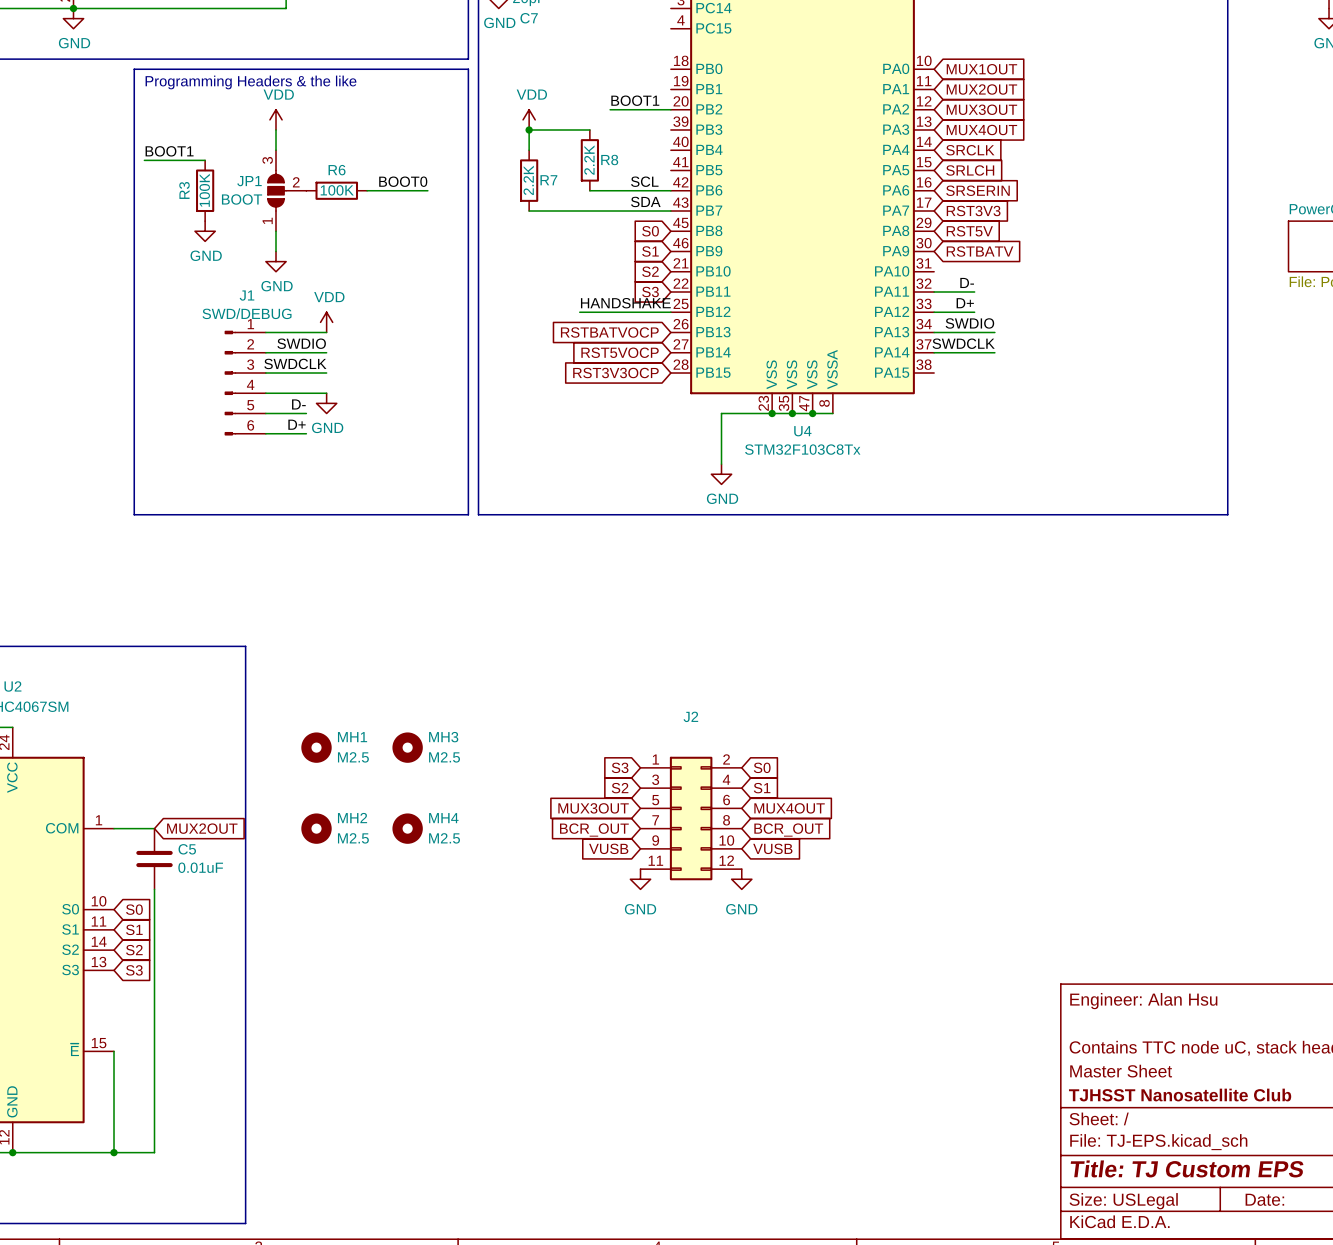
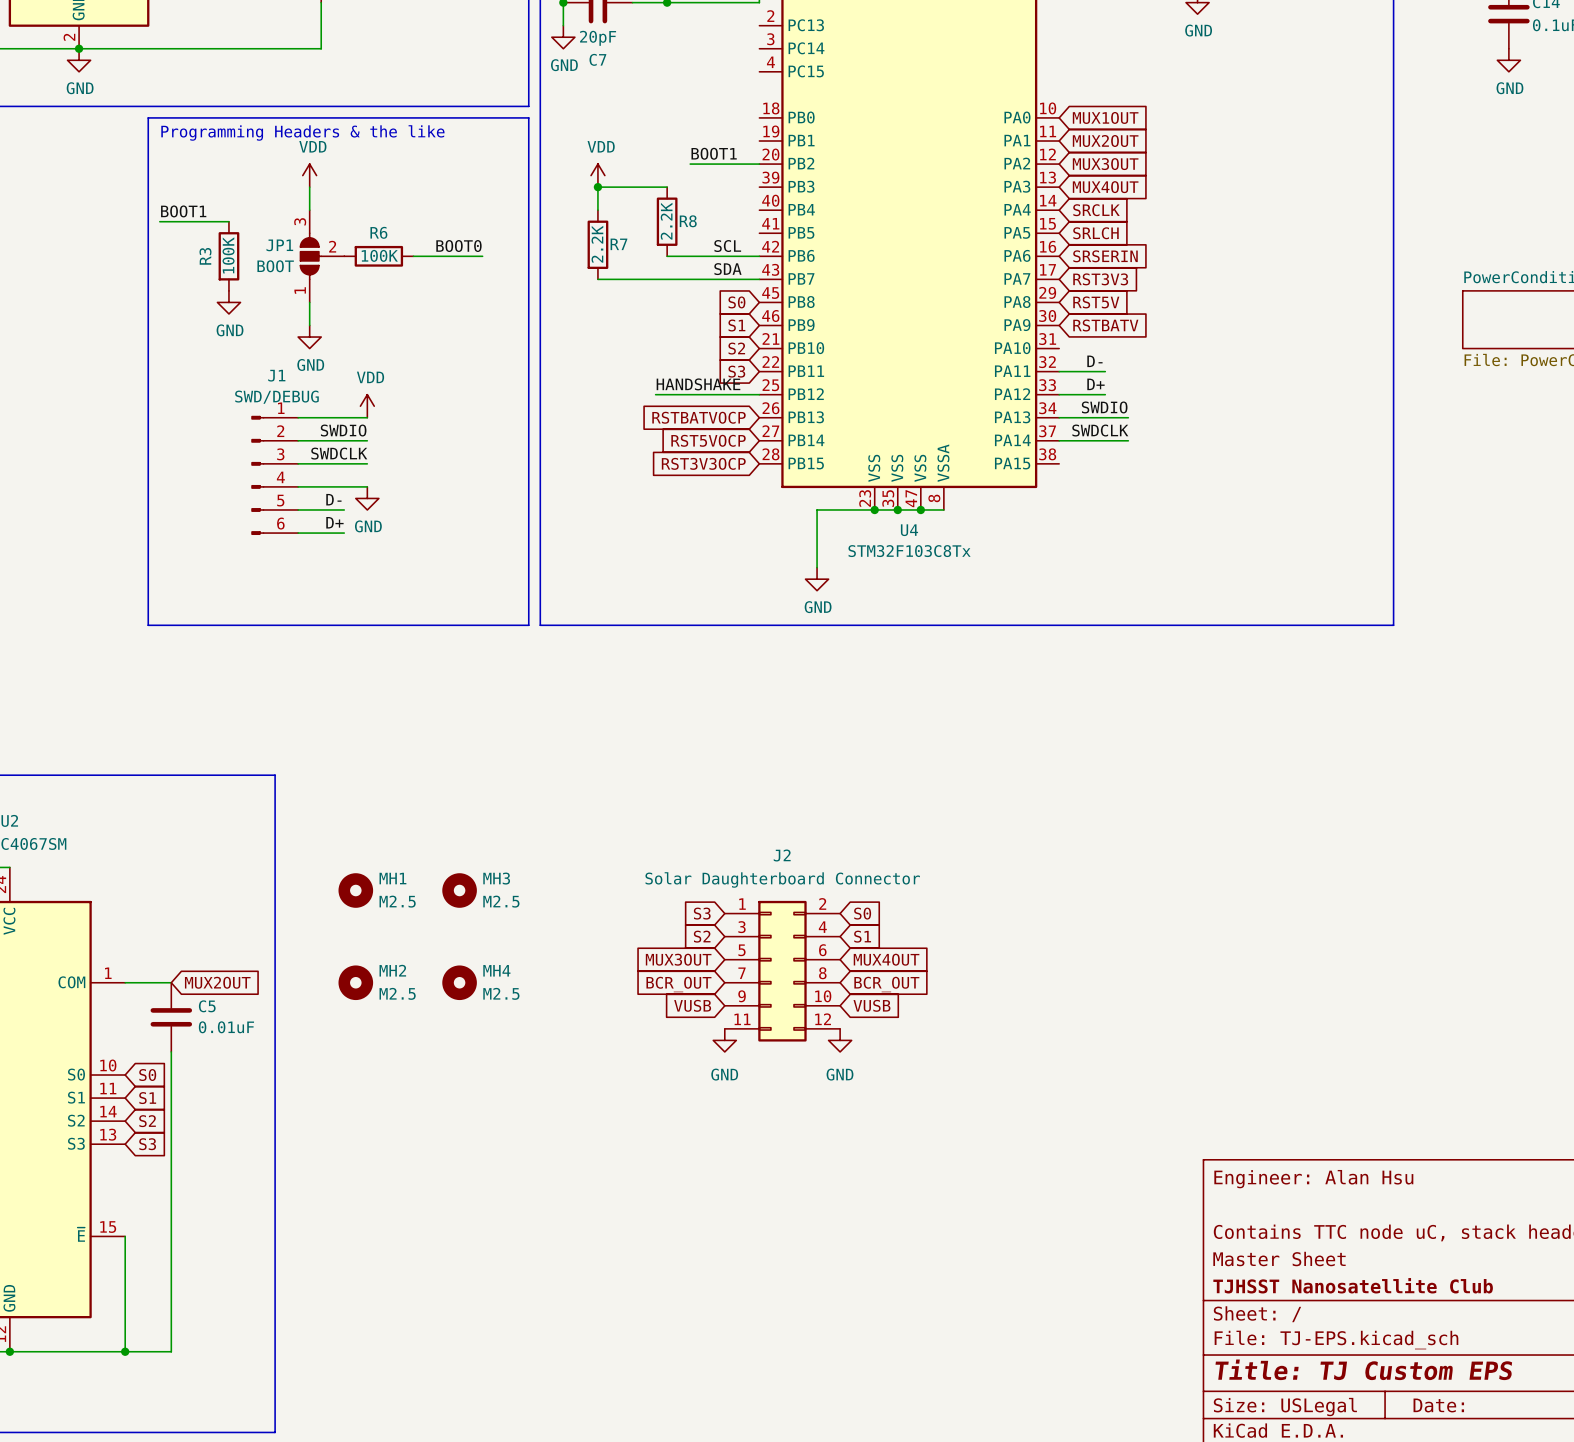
J2 value: none -> Solar Daughterboard Connector (782, 879)

